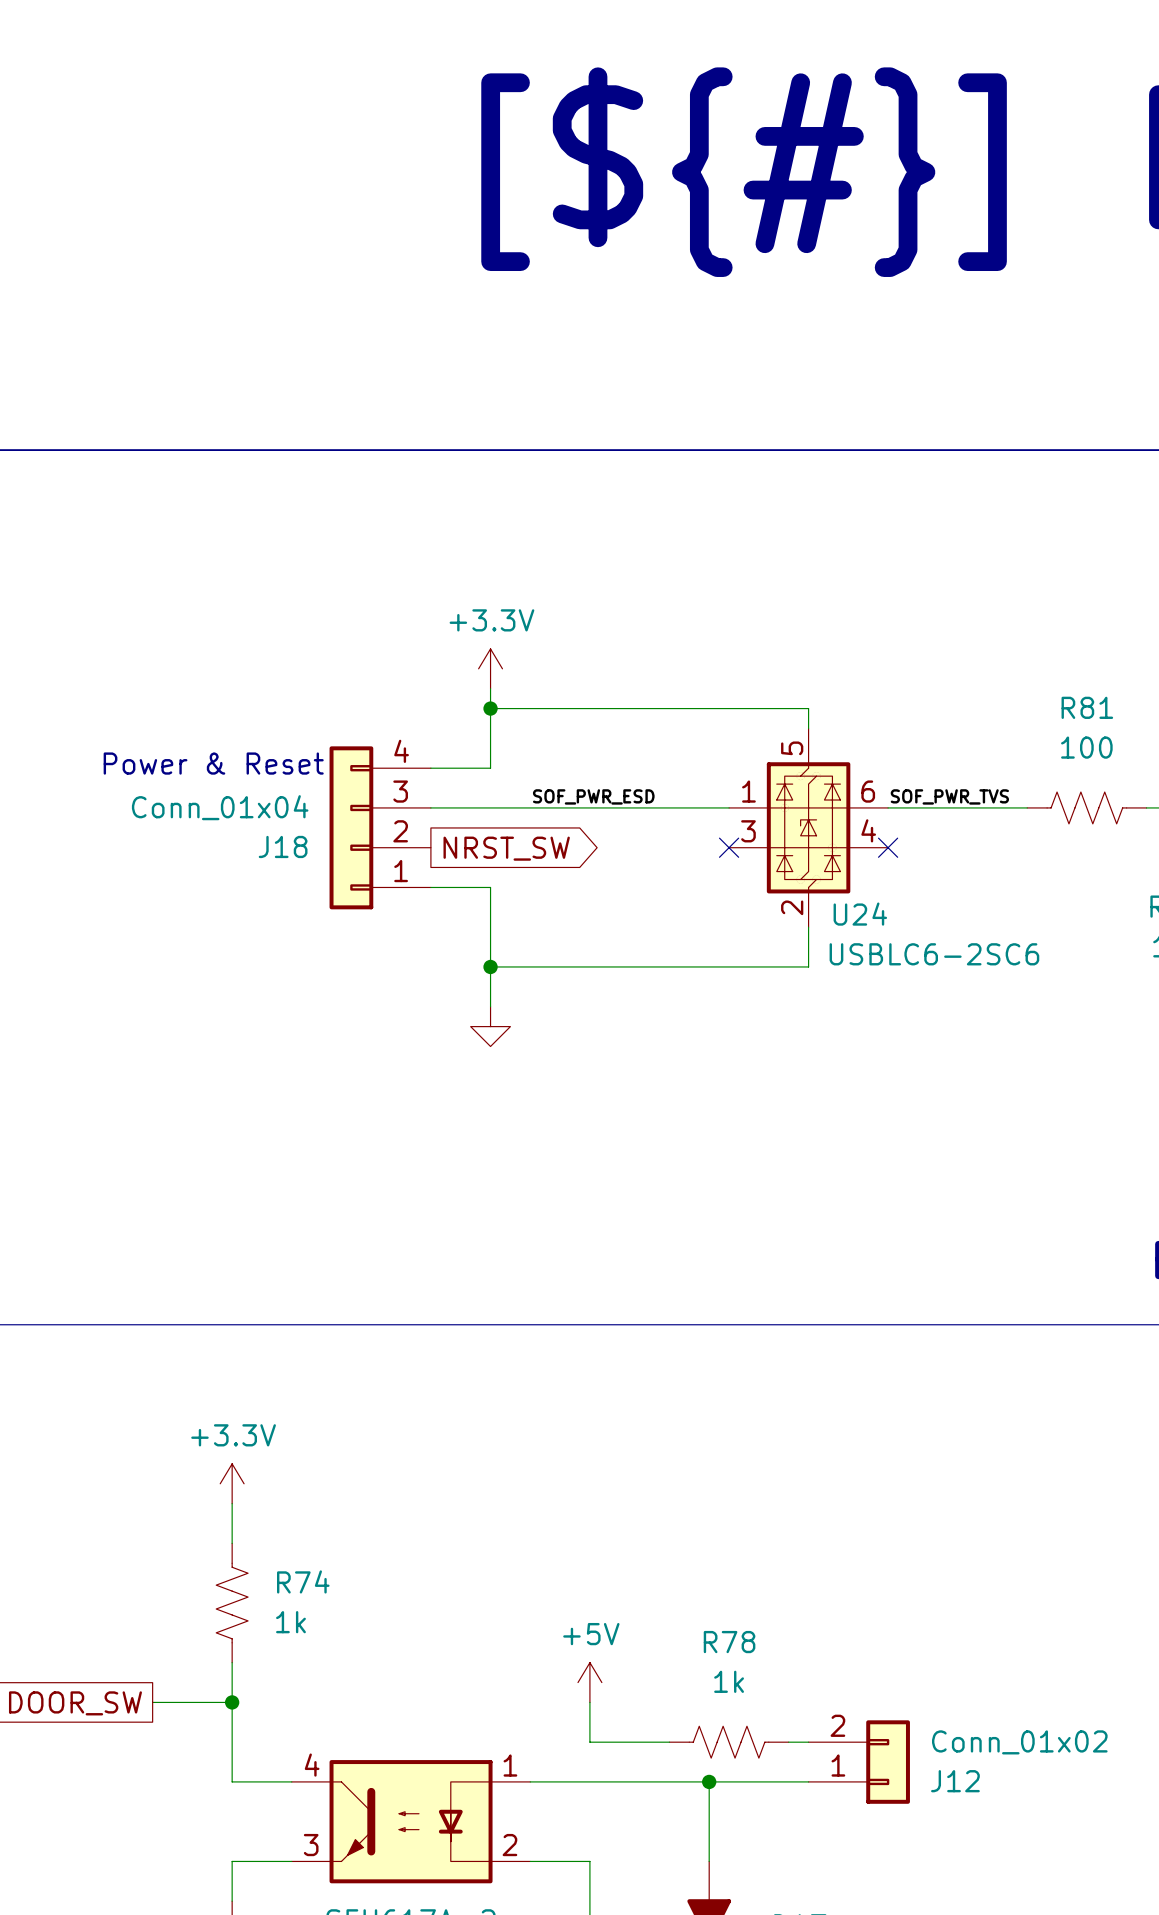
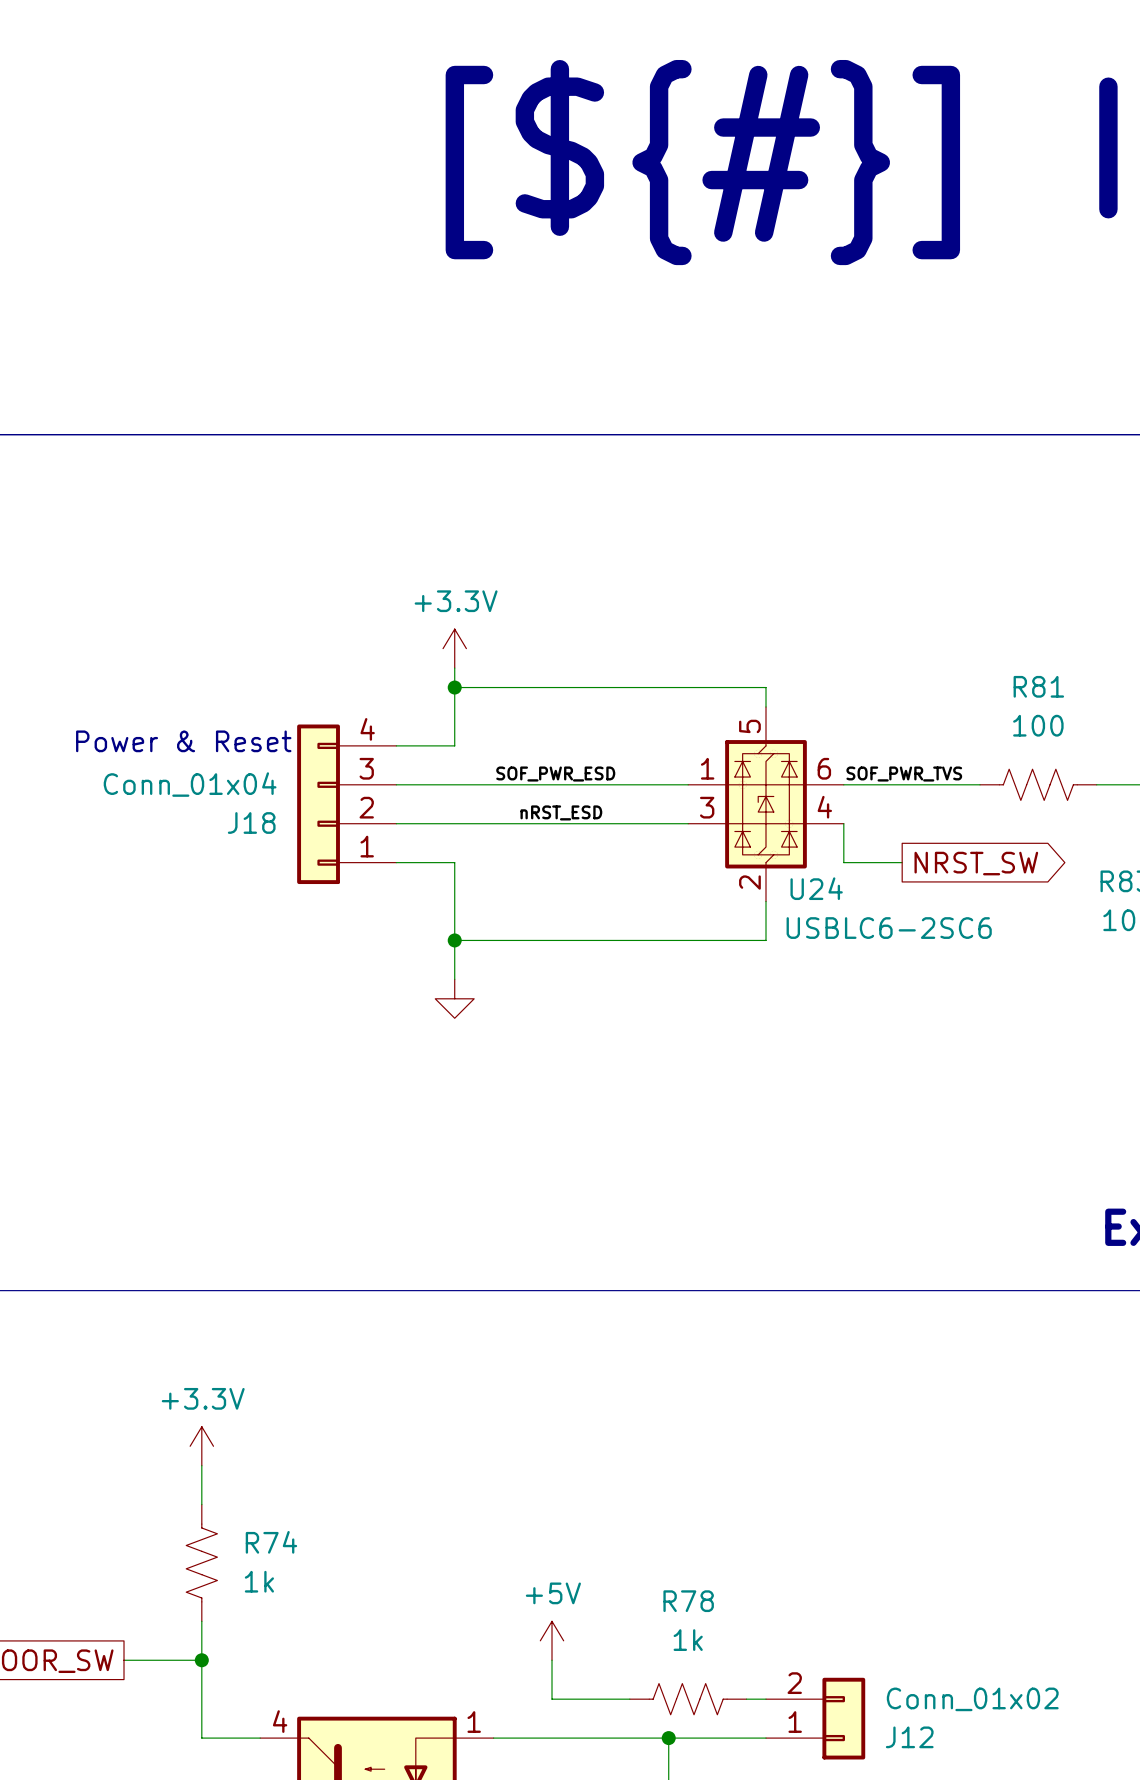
label: none -> nRST_ESD (561, 812)
wire: none -> (396, 823) (688, 823)
no-connect mark: (729, 847) -> none
wire: none -> (843, 823) (843, 862) (902, 862)
no-connect mark: (888, 847) -> none
global label: NRST_SW (506, 848) -> none
global label: none -> NRST_SW (976, 863)

